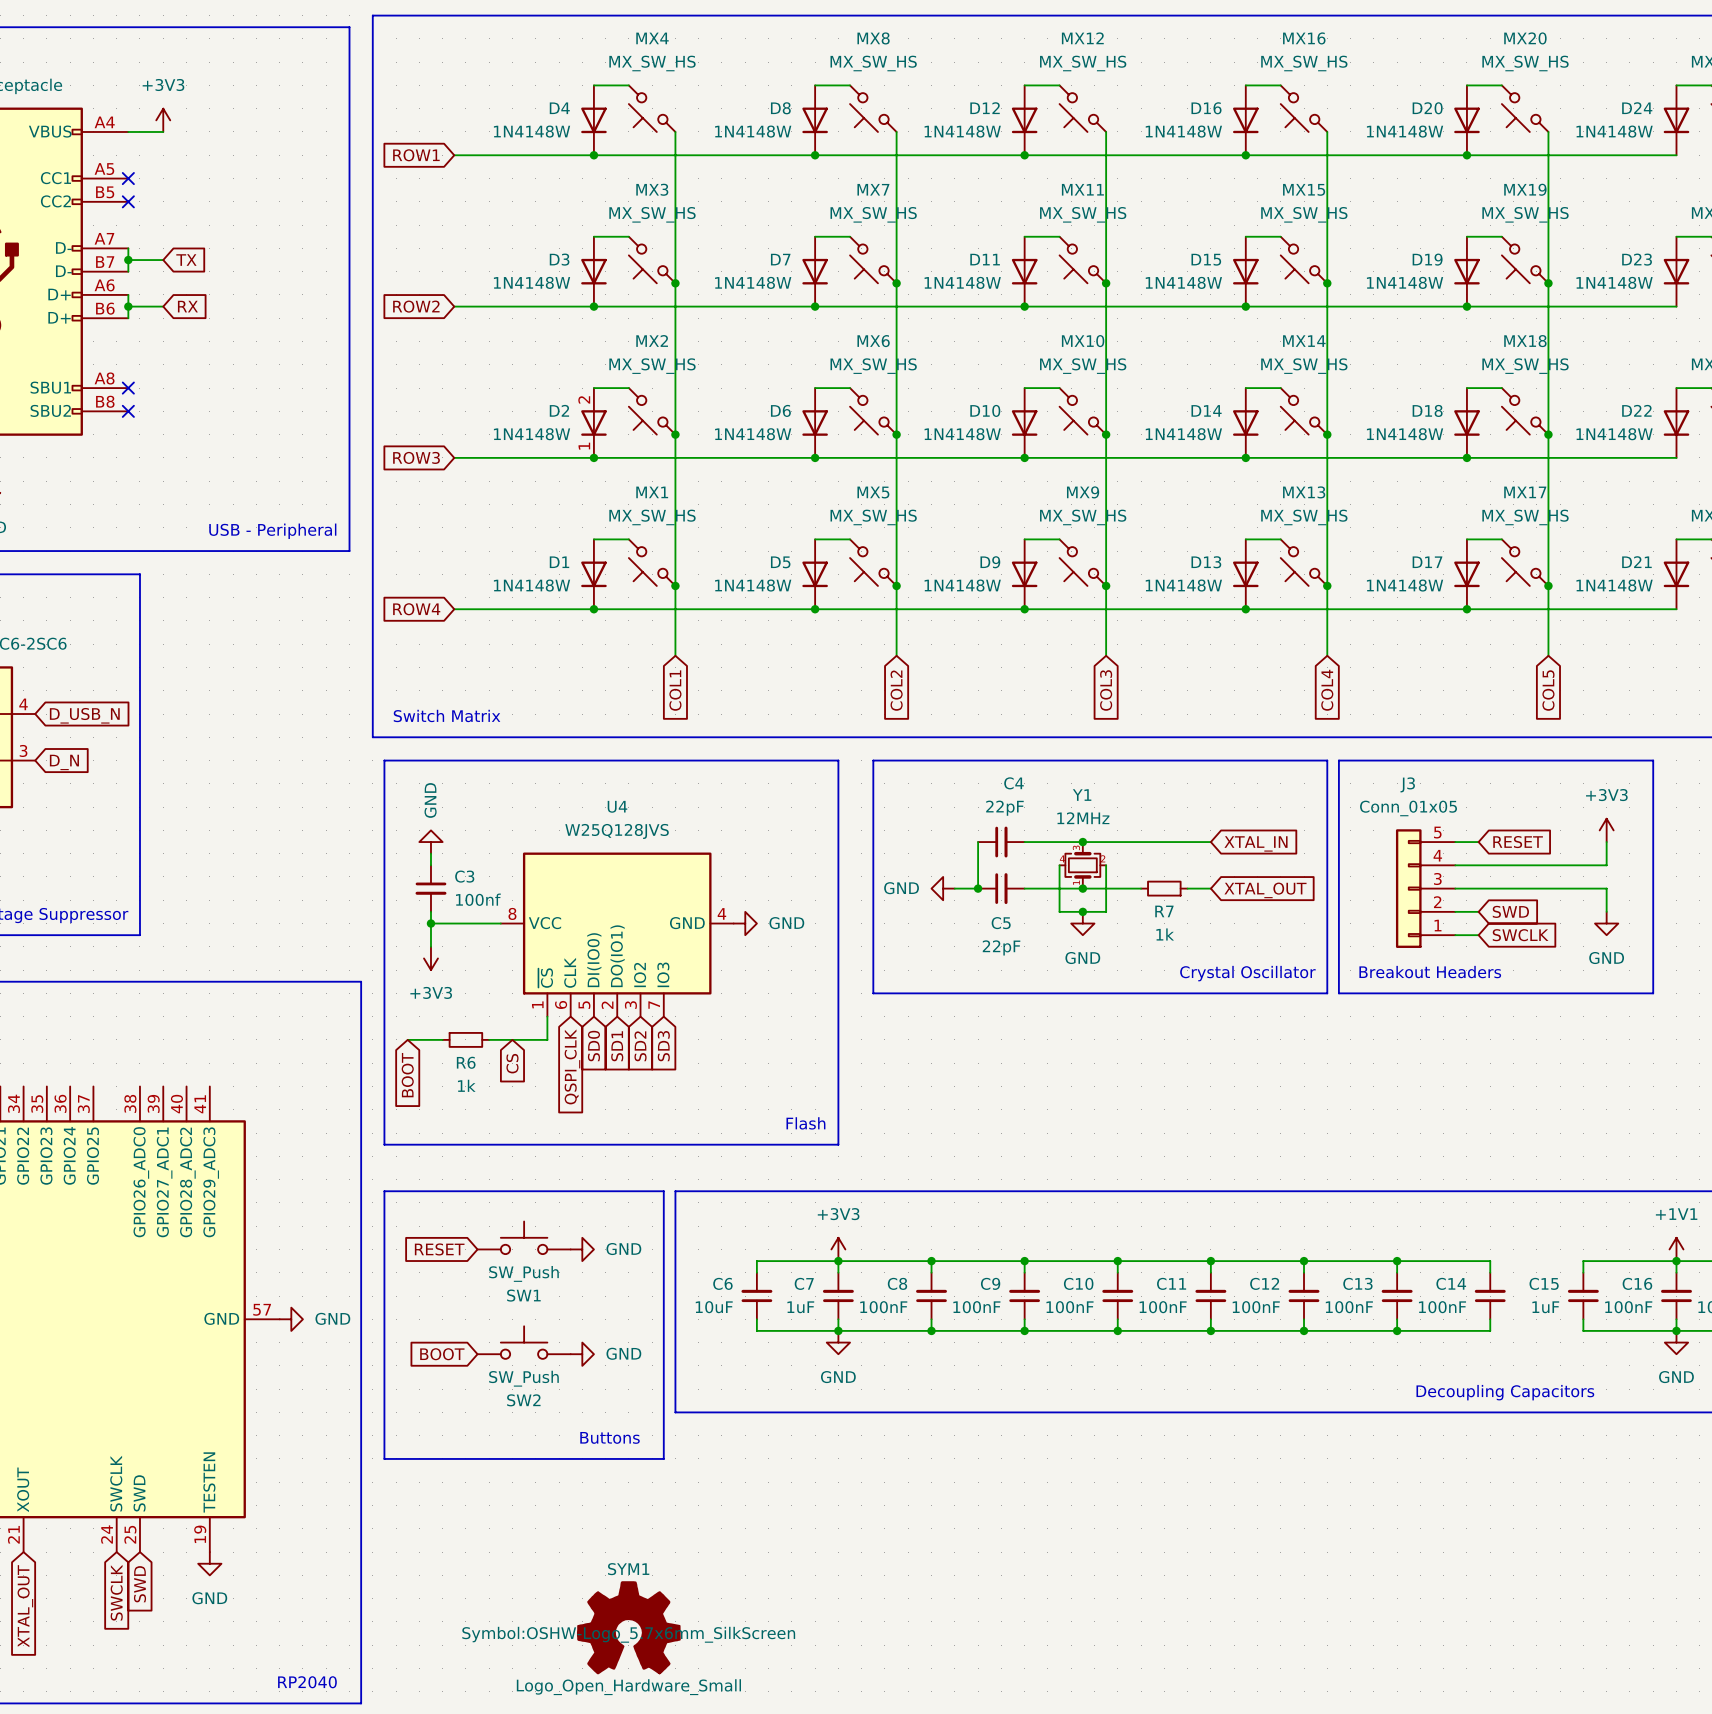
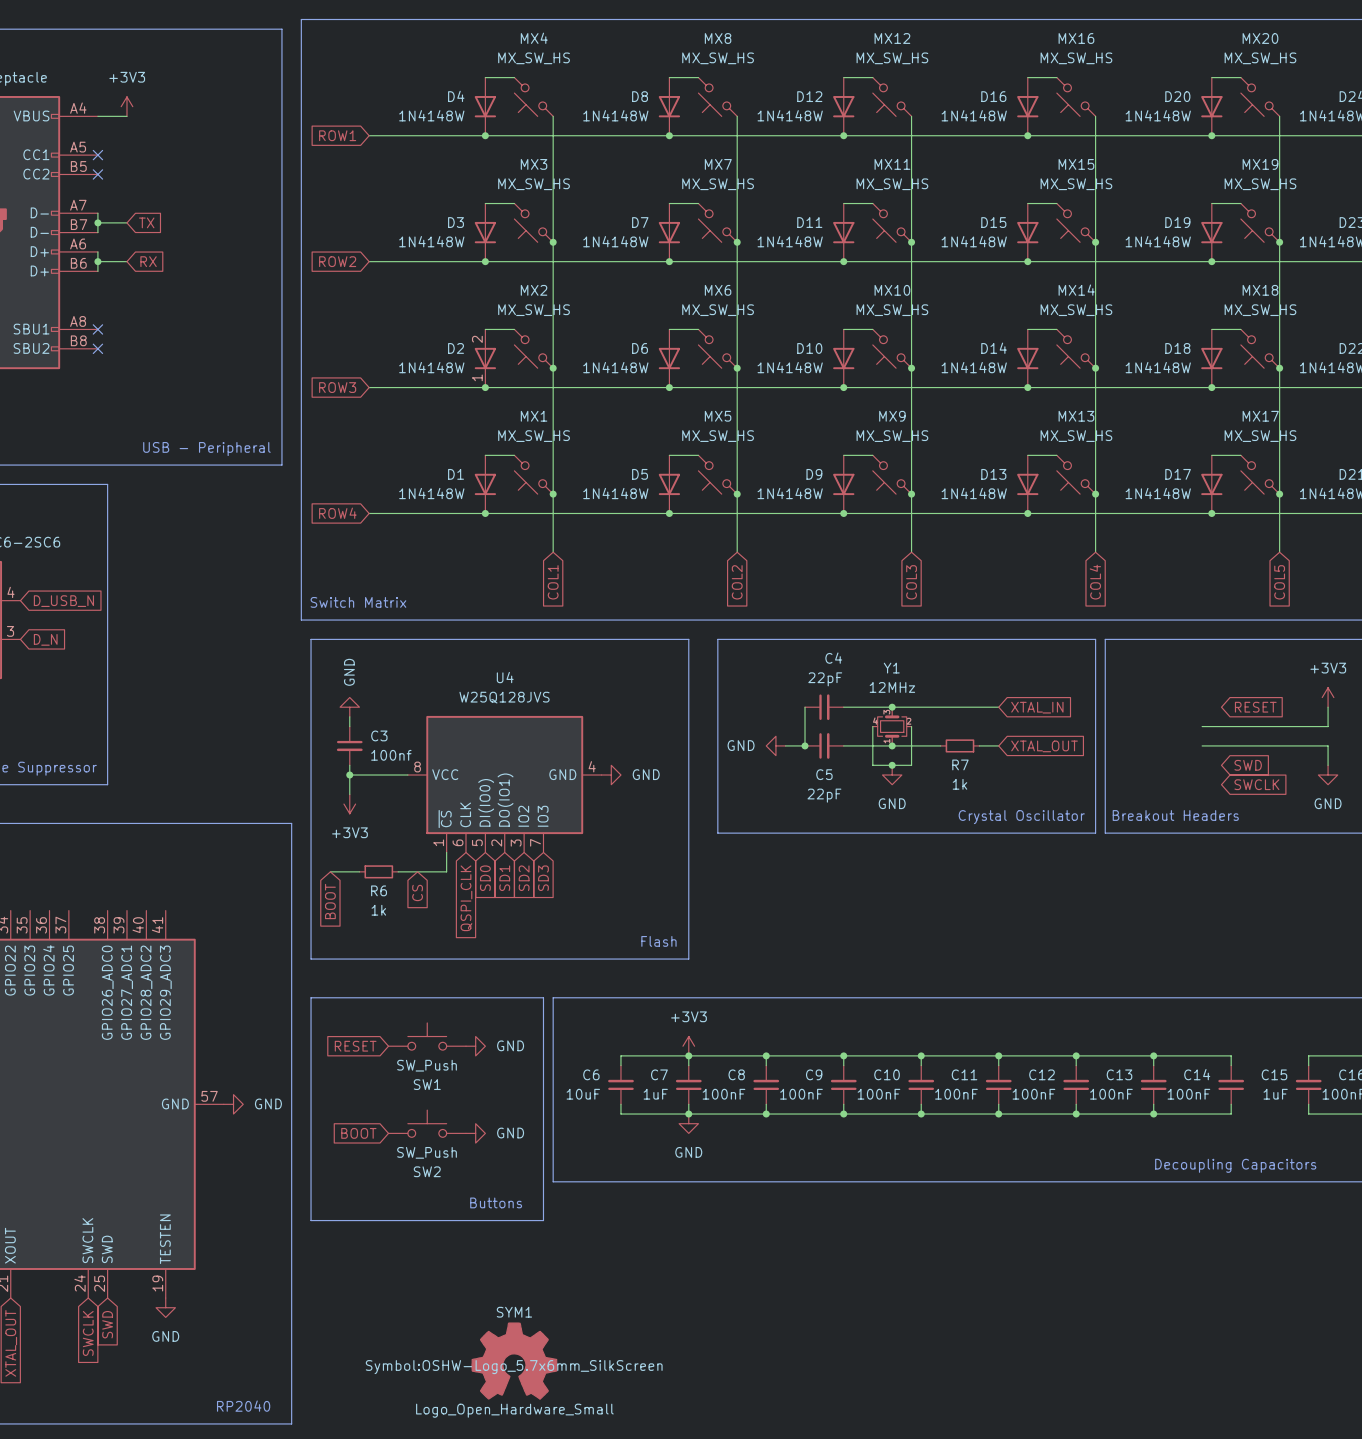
wire: (1455, 842) (1478, 842) -> none
J3: Conn_01x05 (1425, 888) -> none
wire: (1455, 911) (1478, 911) -> none
wire: (1455, 935) (1478, 935) -> none

